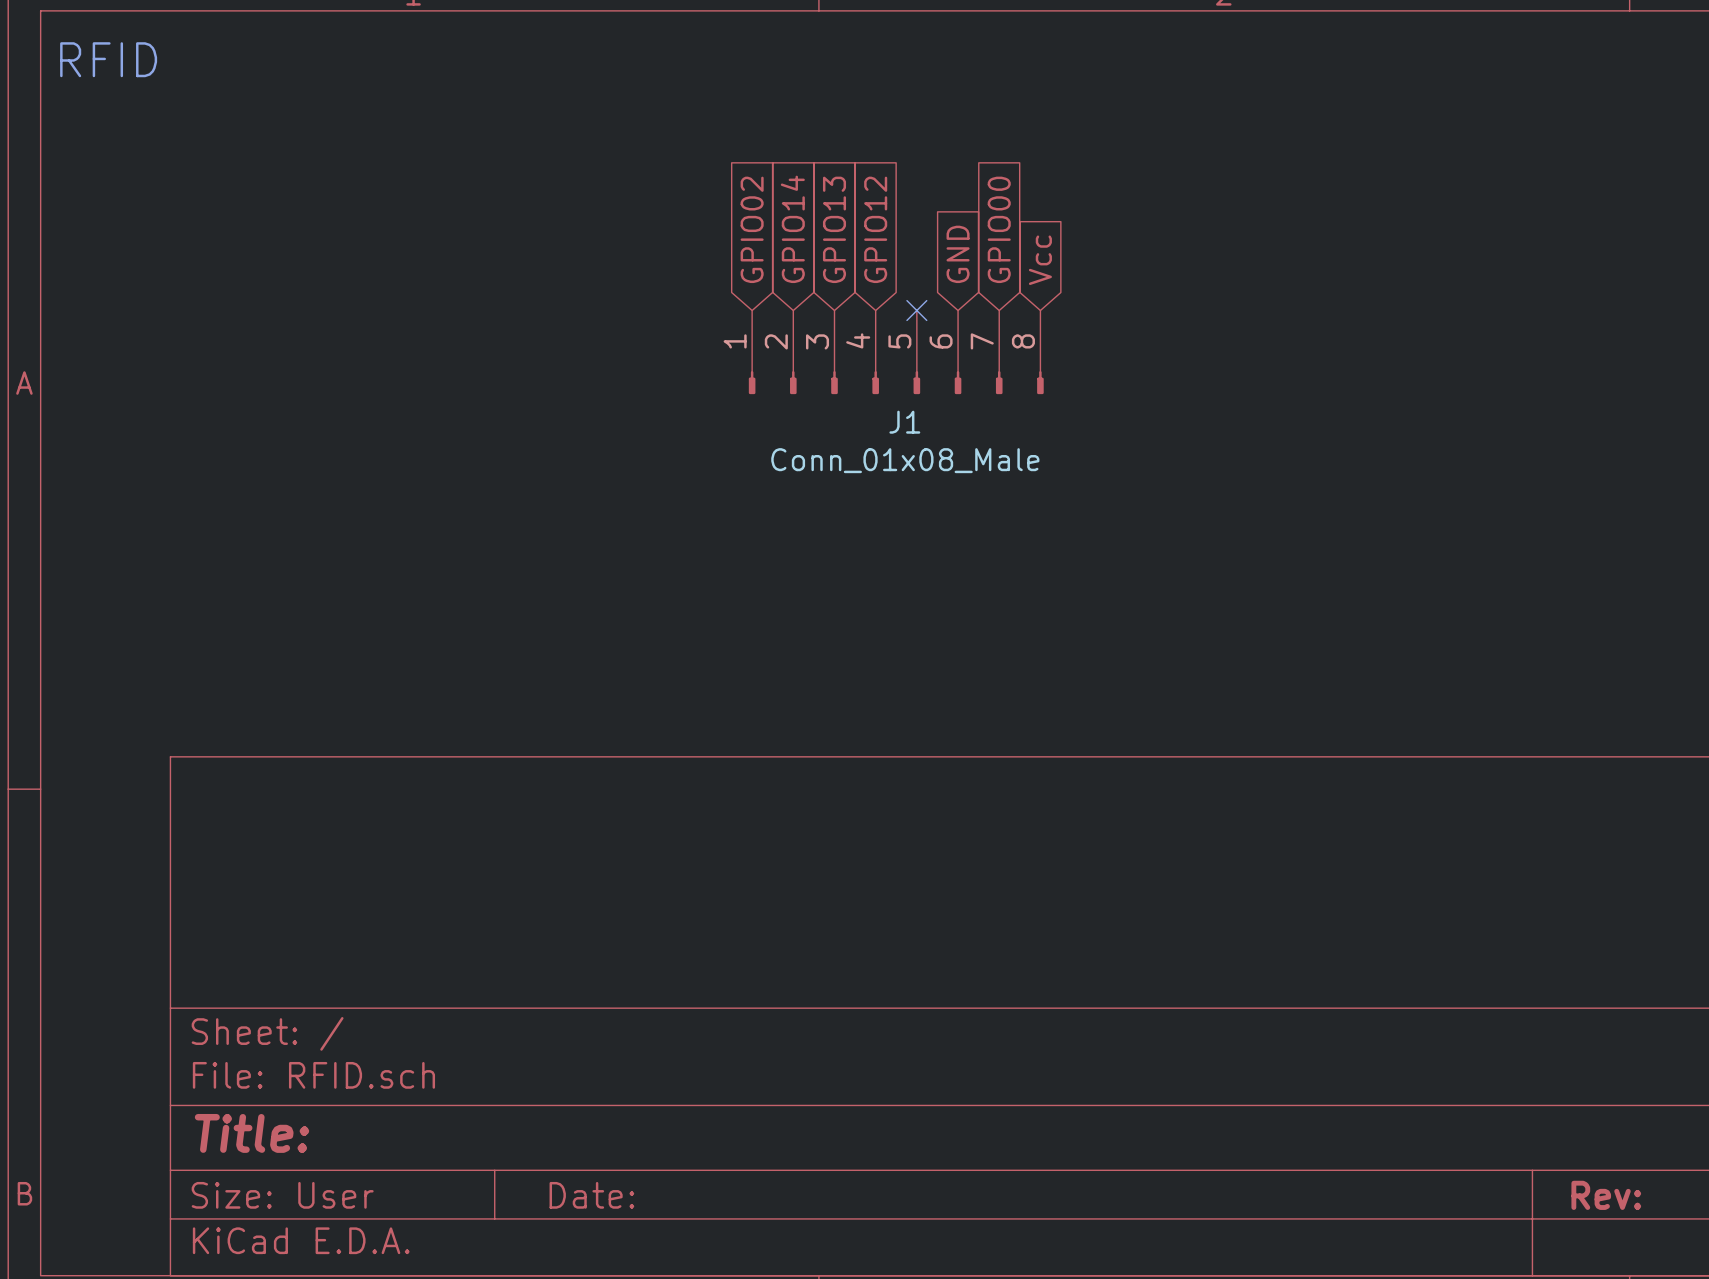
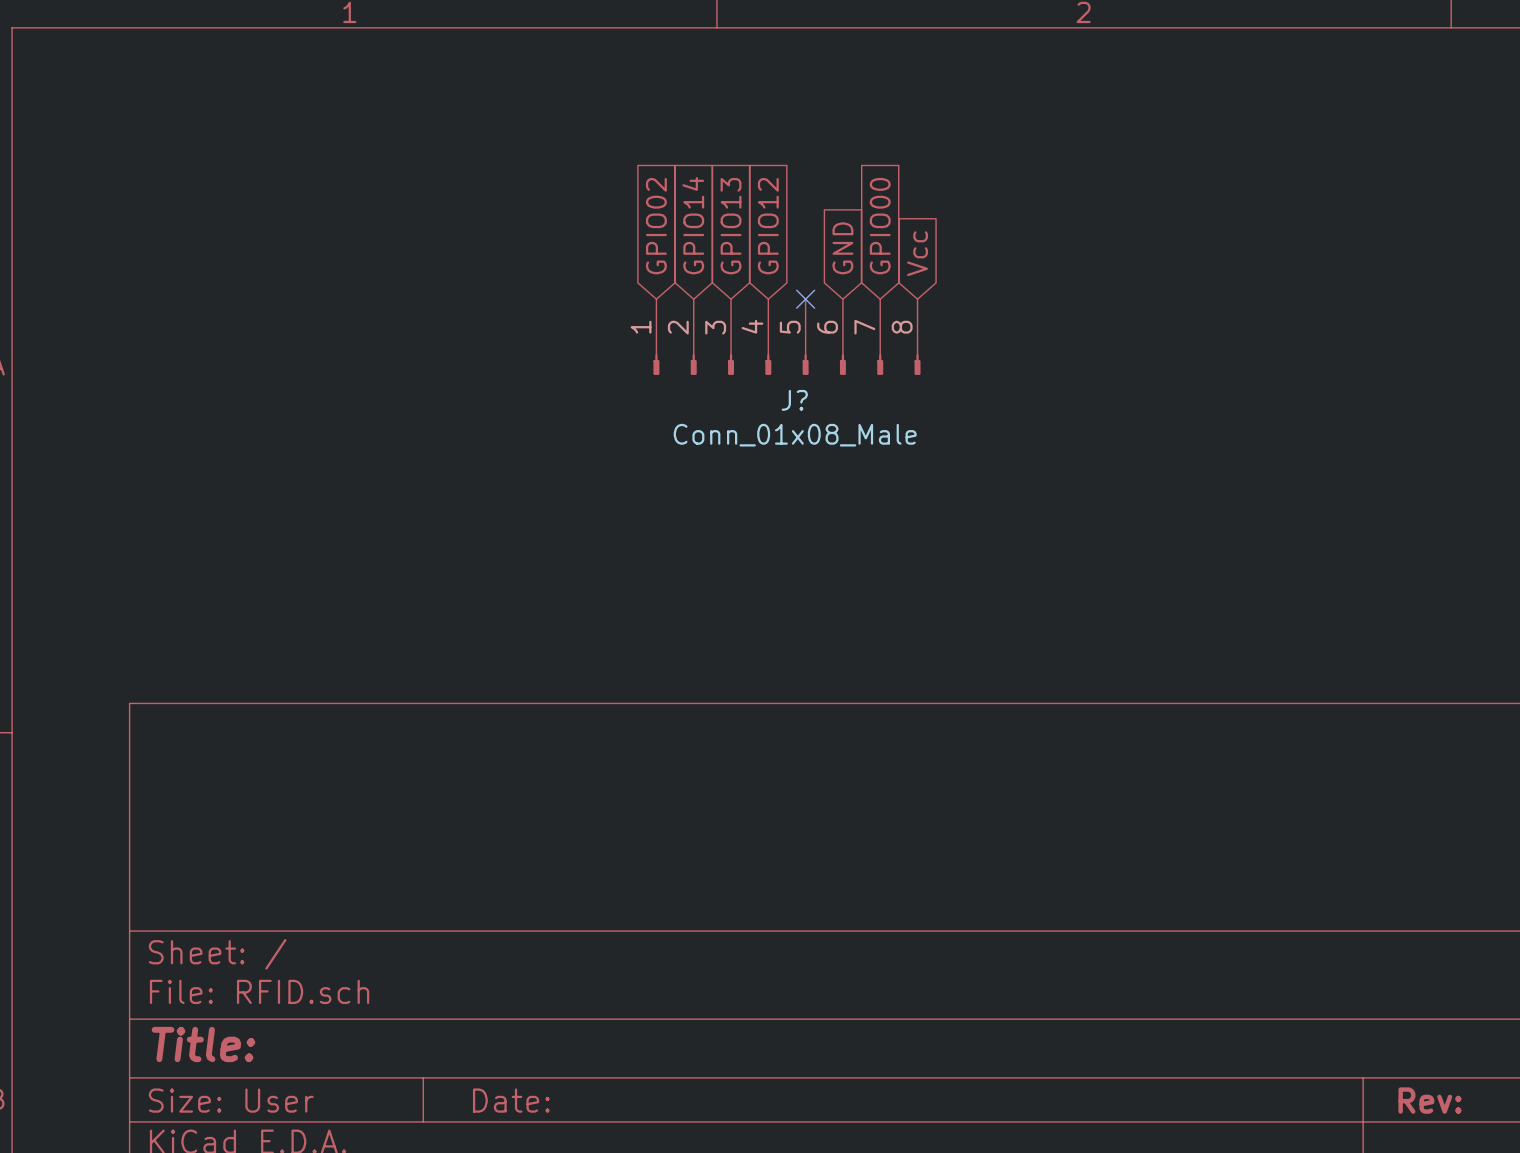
text: RFID (108, 59) -> none
J1 name: J1 (904, 422) -> J? (794, 400)

